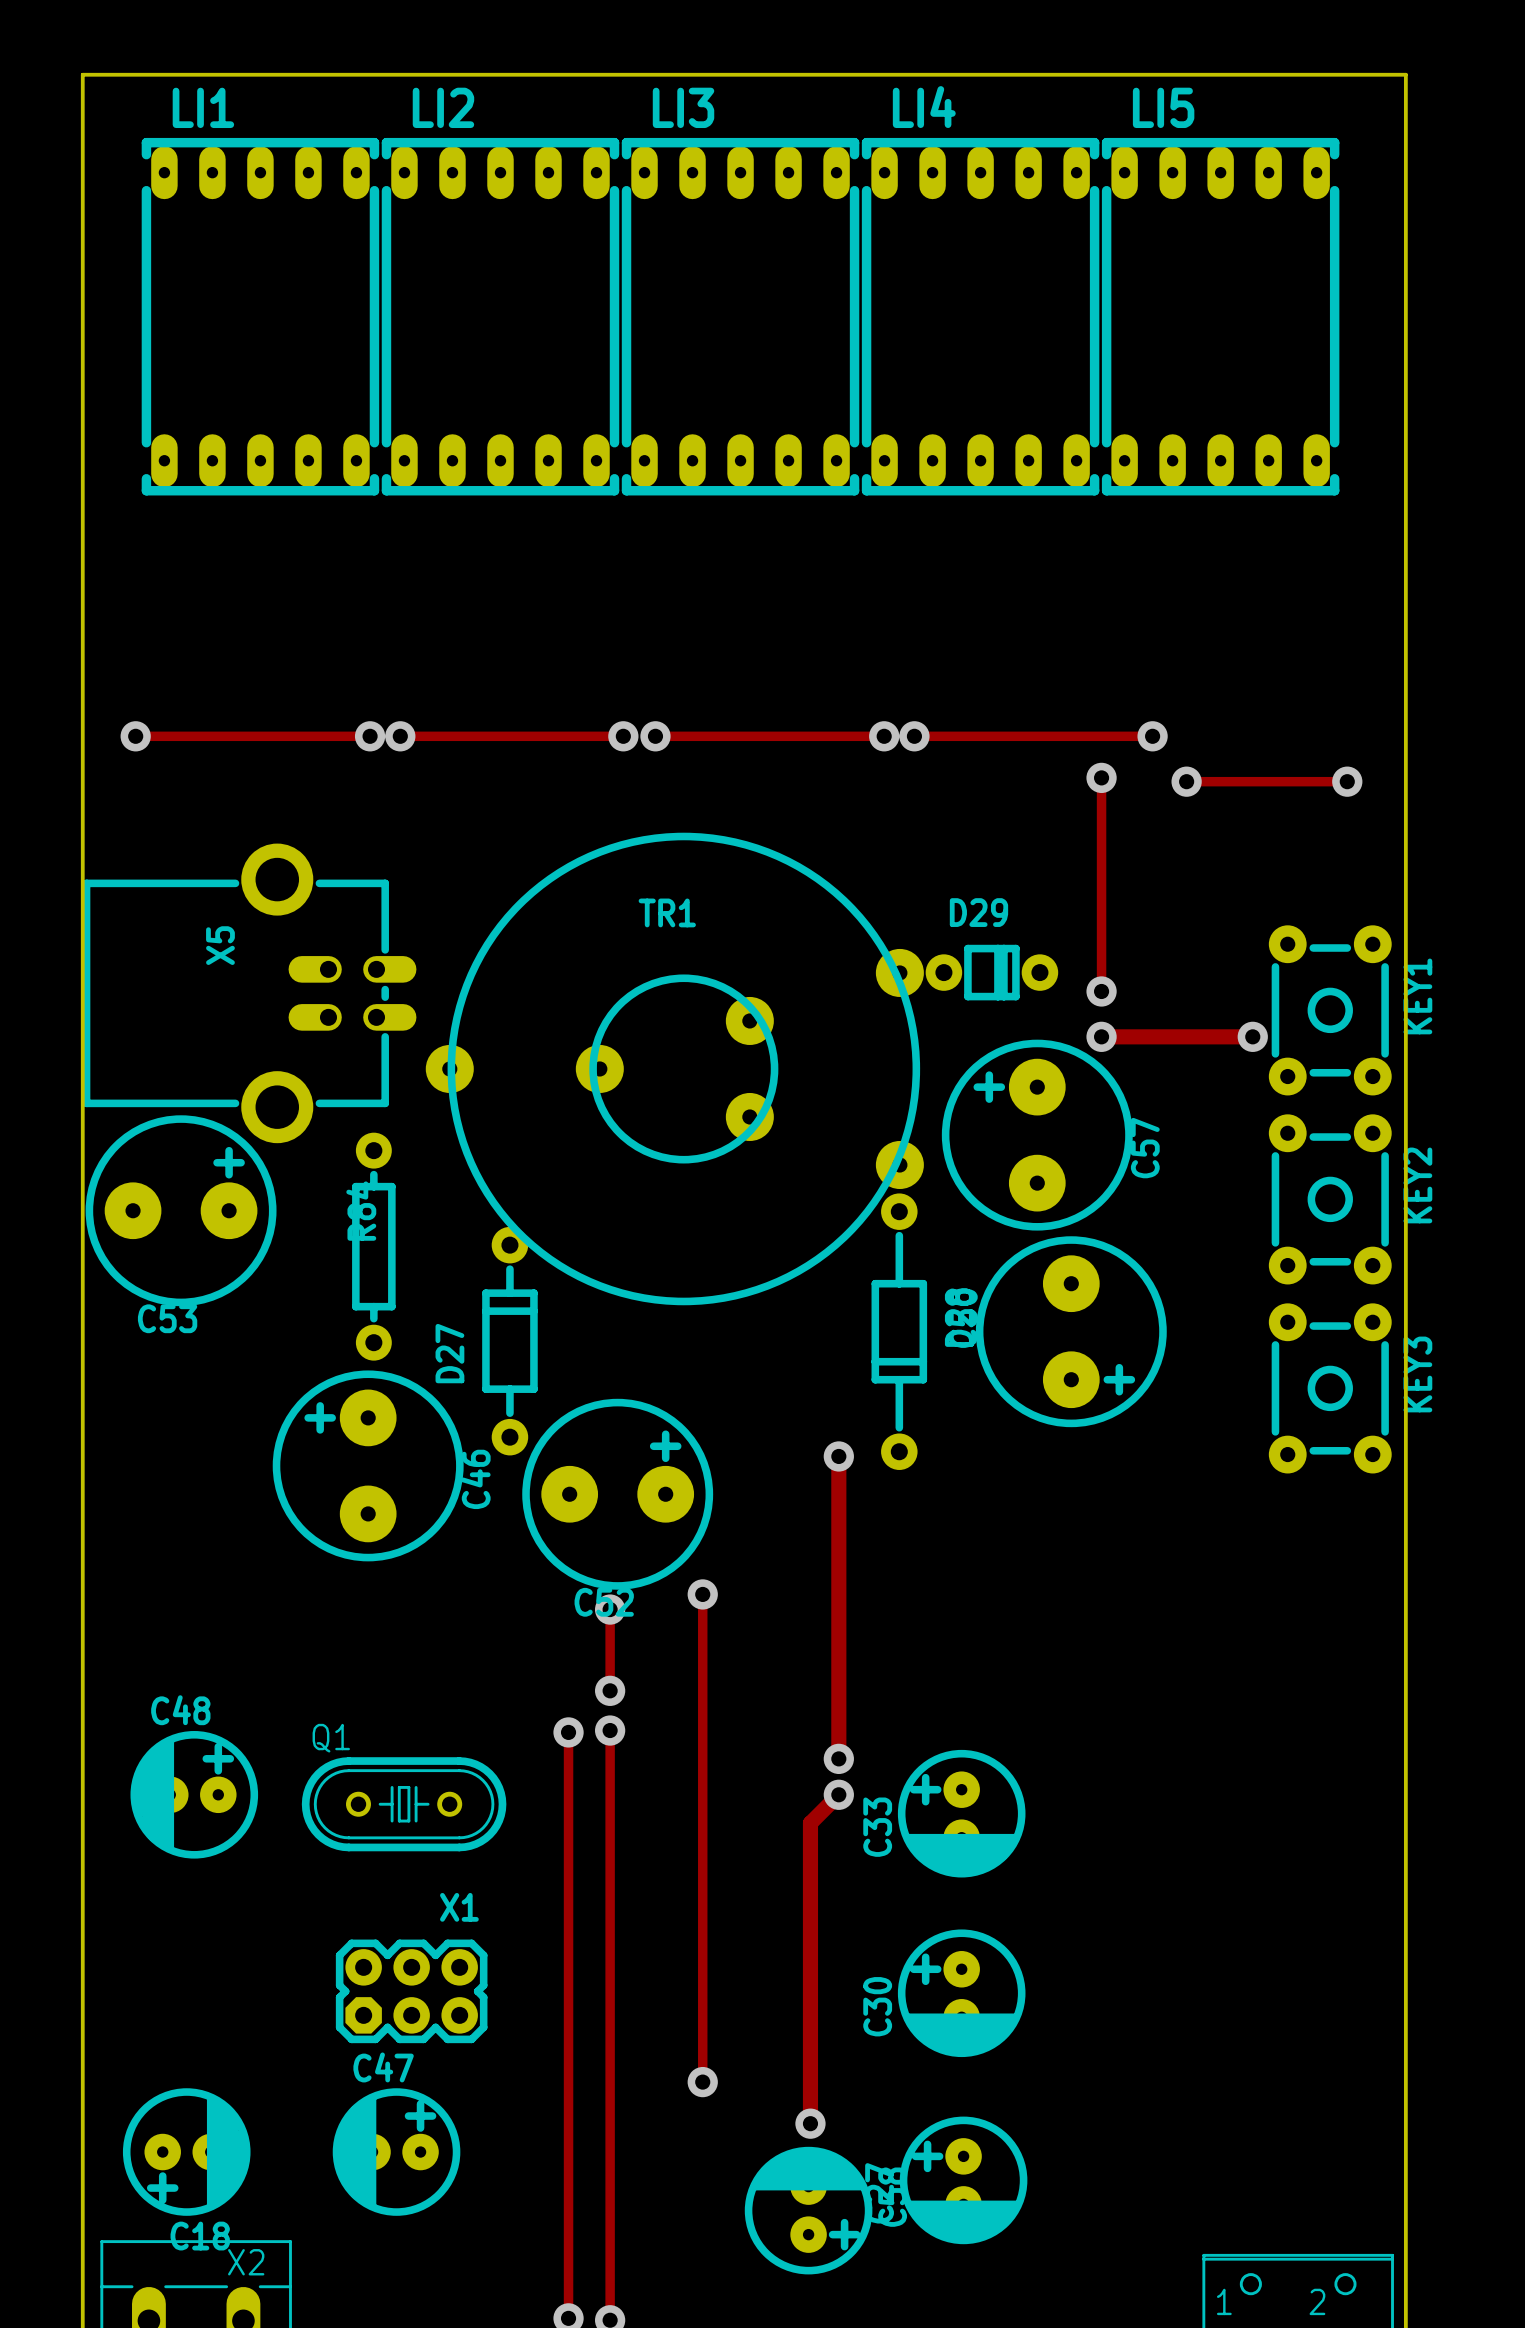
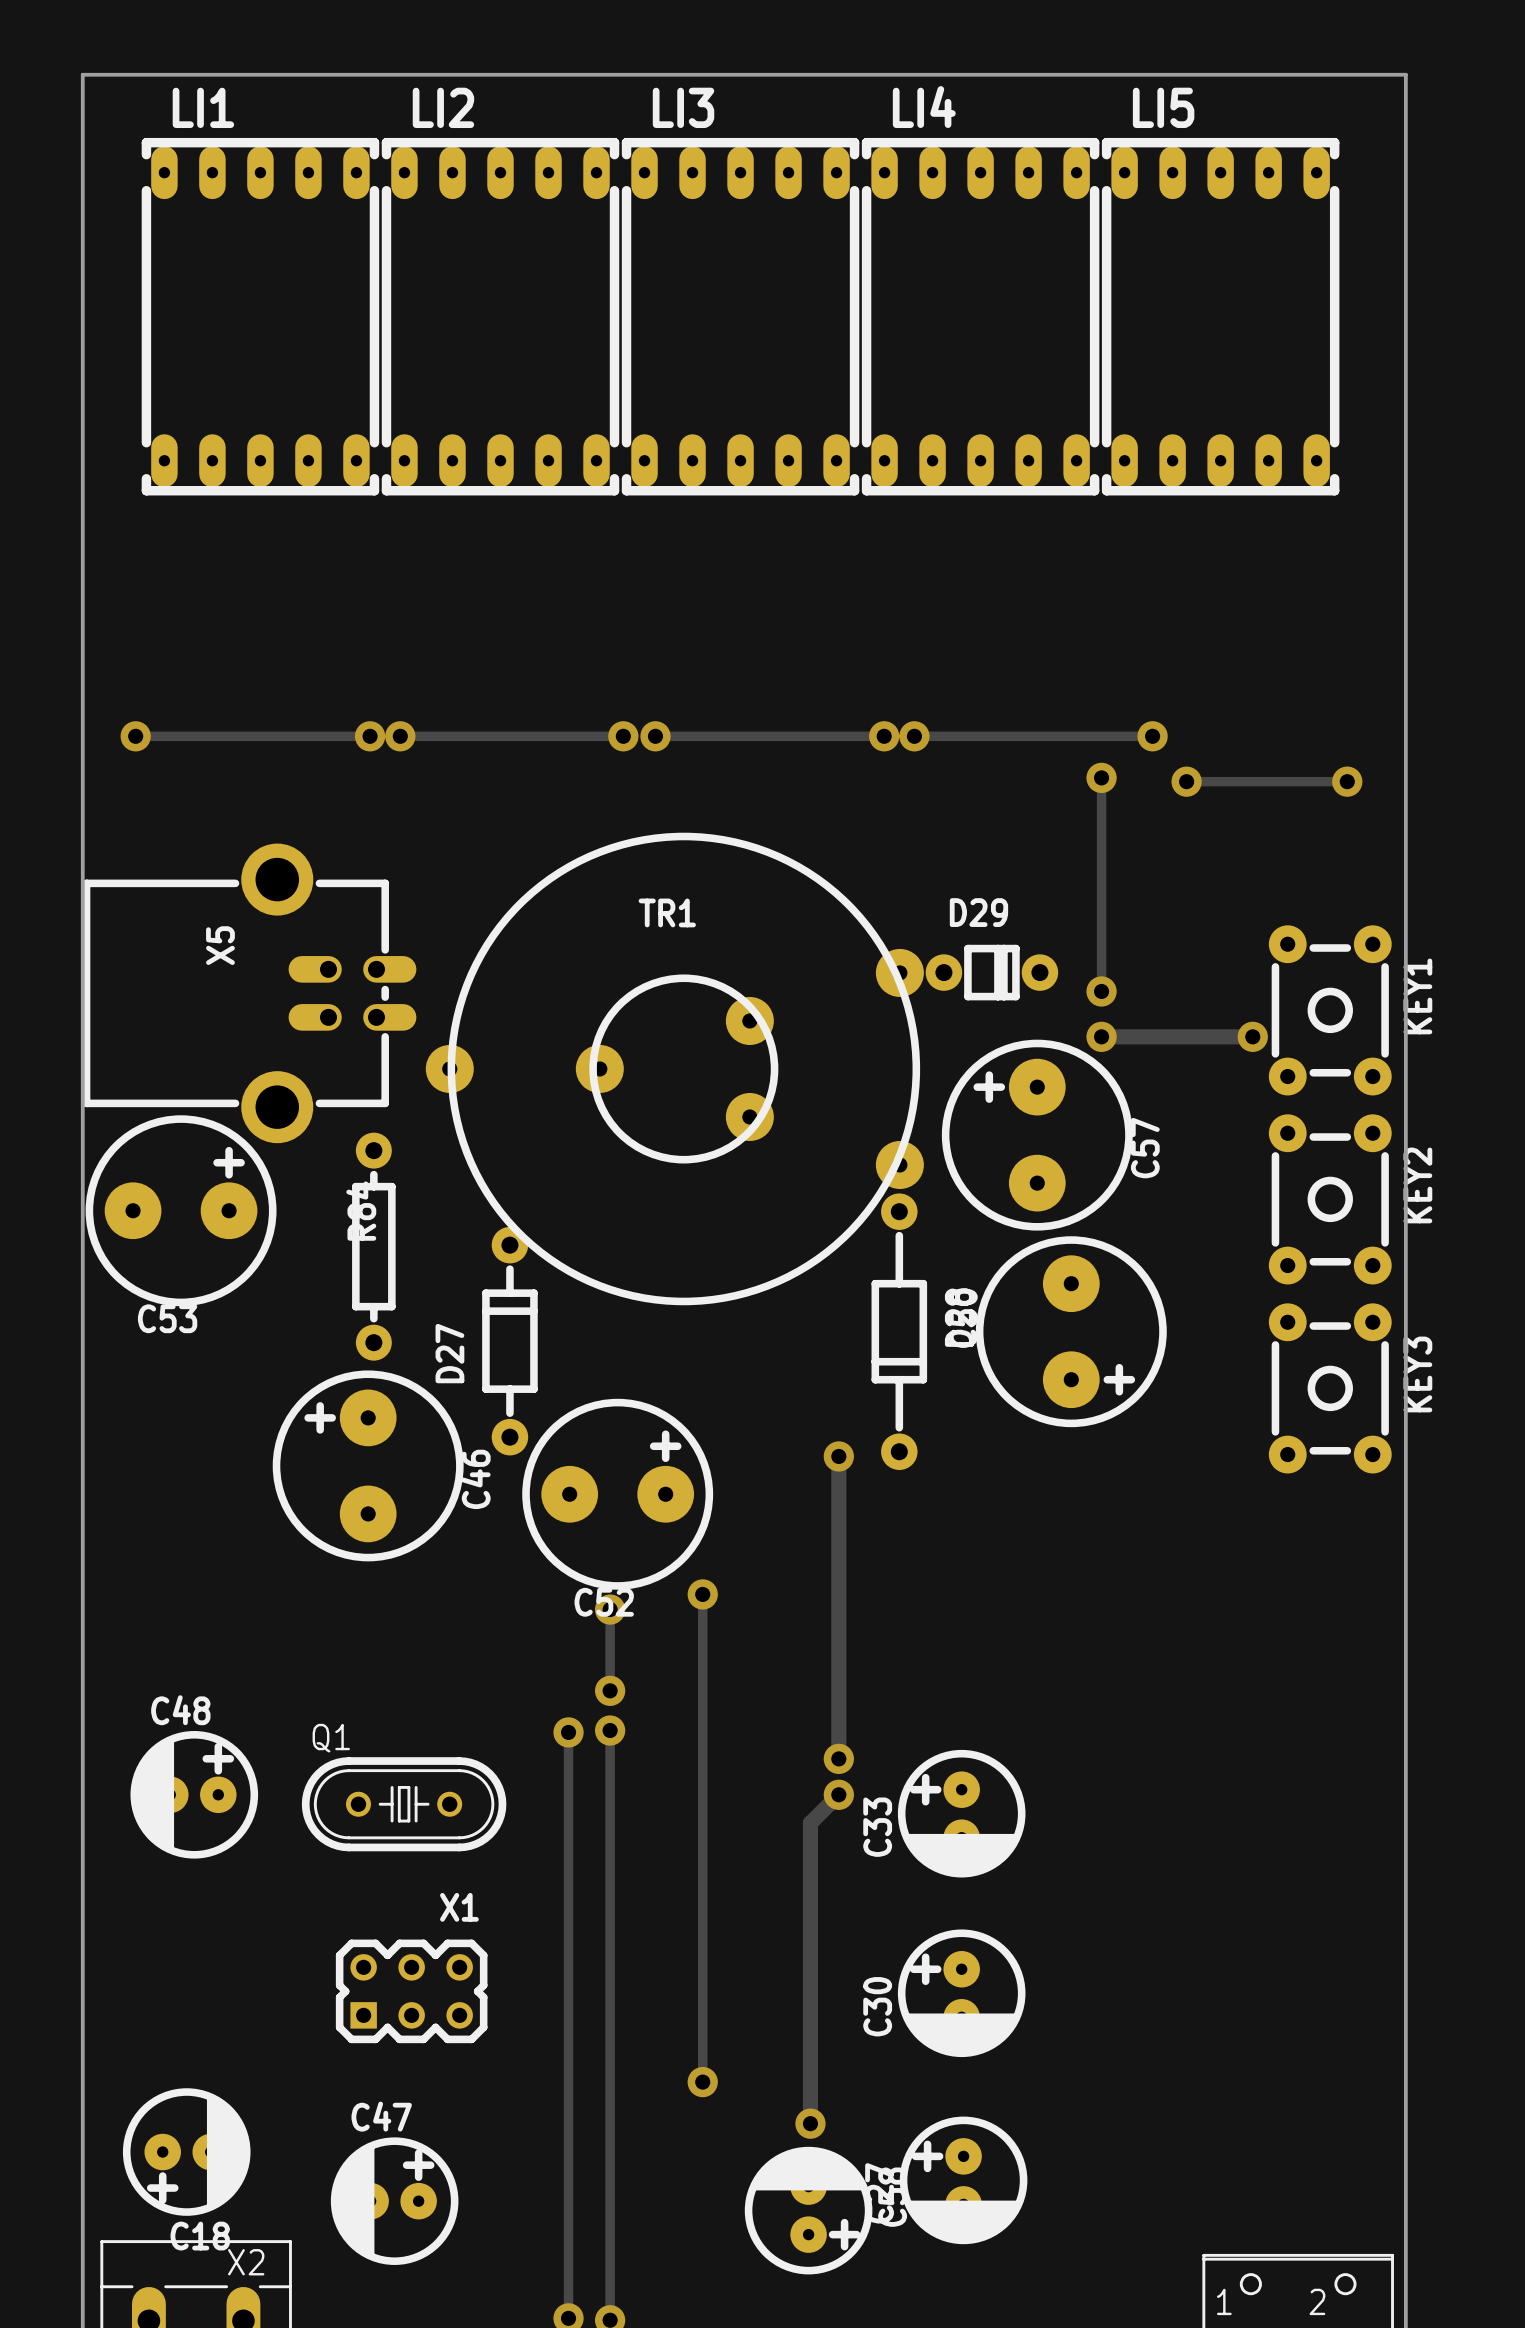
X1 footprint: [335, 1939, 488, 2044] -> [335, 1939, 488, 2044]
C47 position: (396, 2152) -> (394, 2201)

